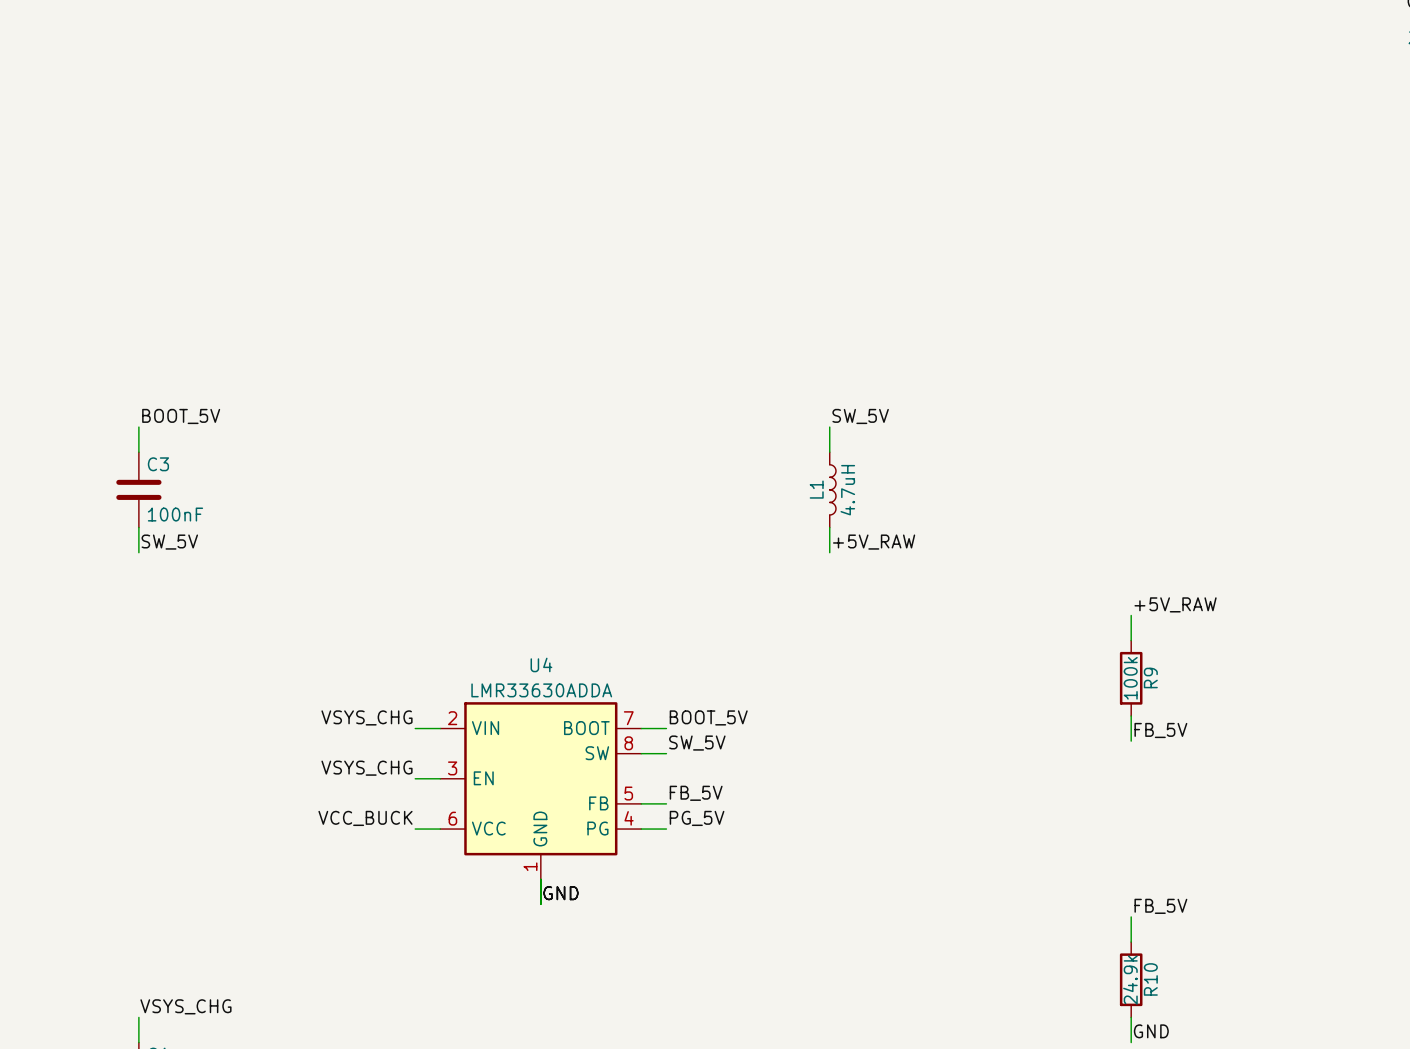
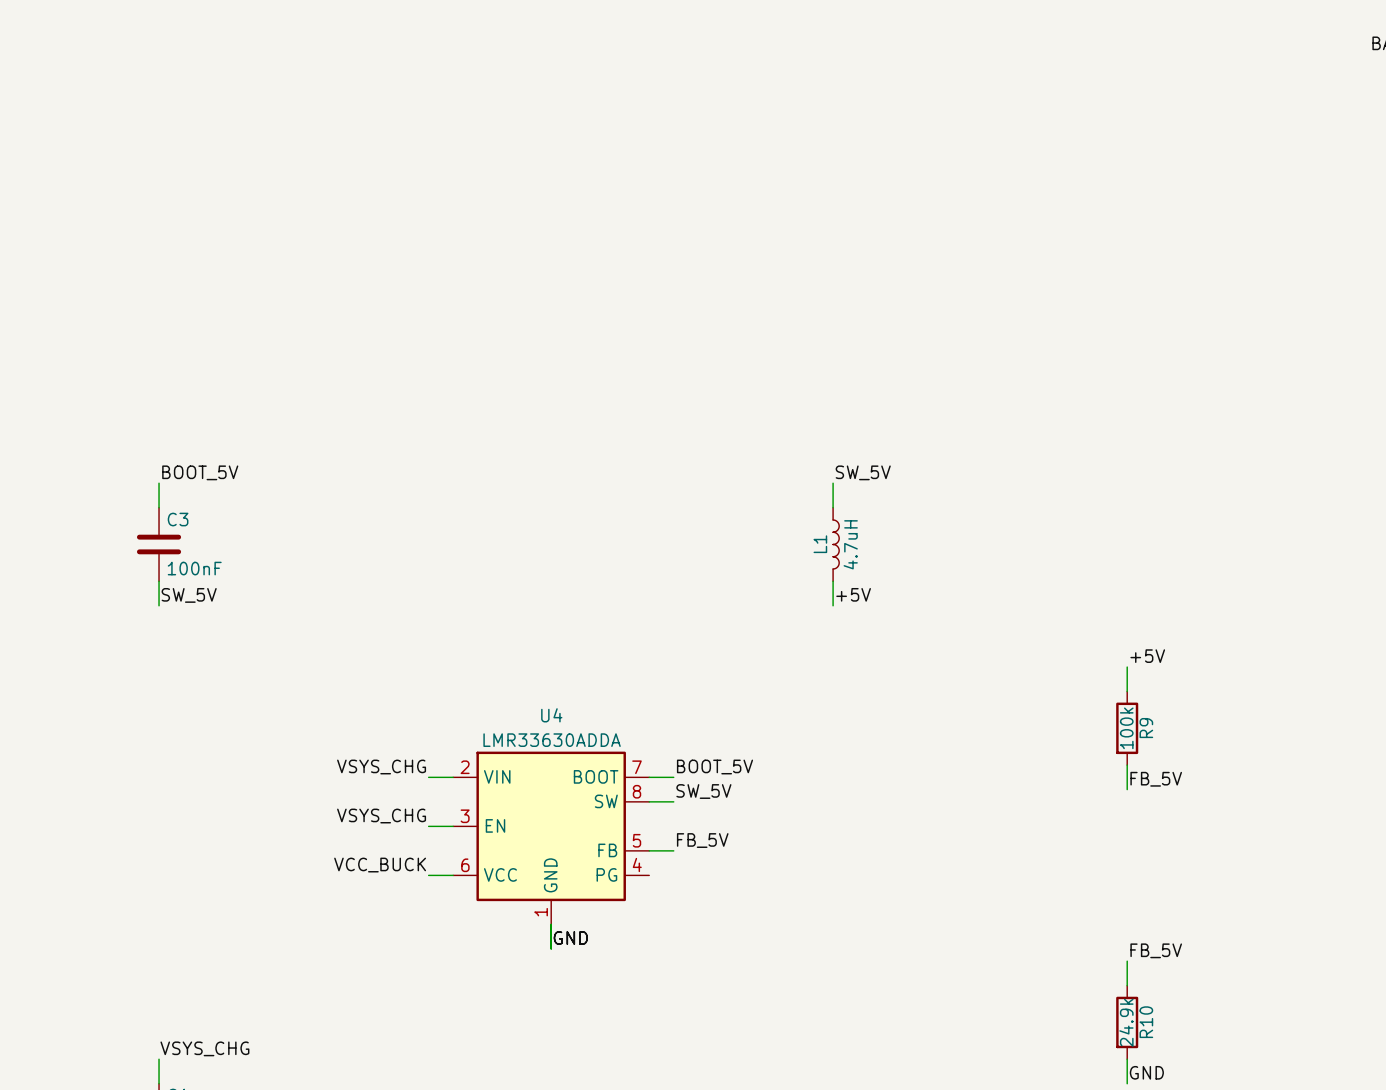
label: +5V_RAW (874, 542) -> +5V (853, 594)
label: +5V_RAW (1175, 604) -> +5V (1147, 656)
label: PG_5V (697, 818) -> none
wire: (641, 829) (666, 829) -> none

